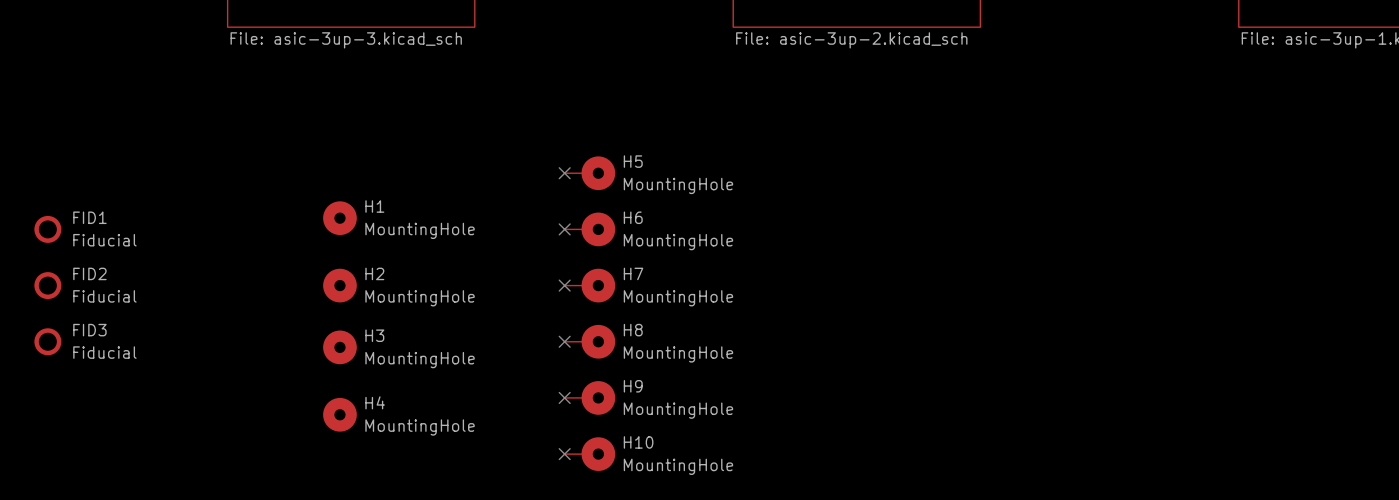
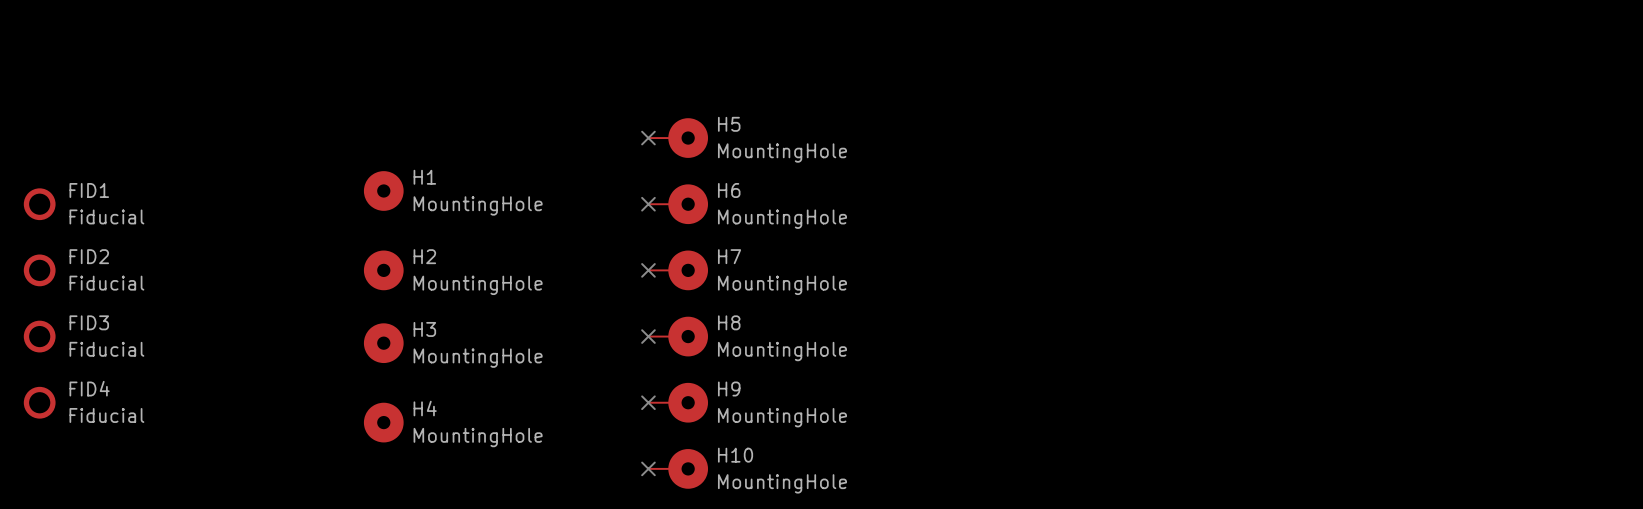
FID4: none -> Fiducial (39, 402)

